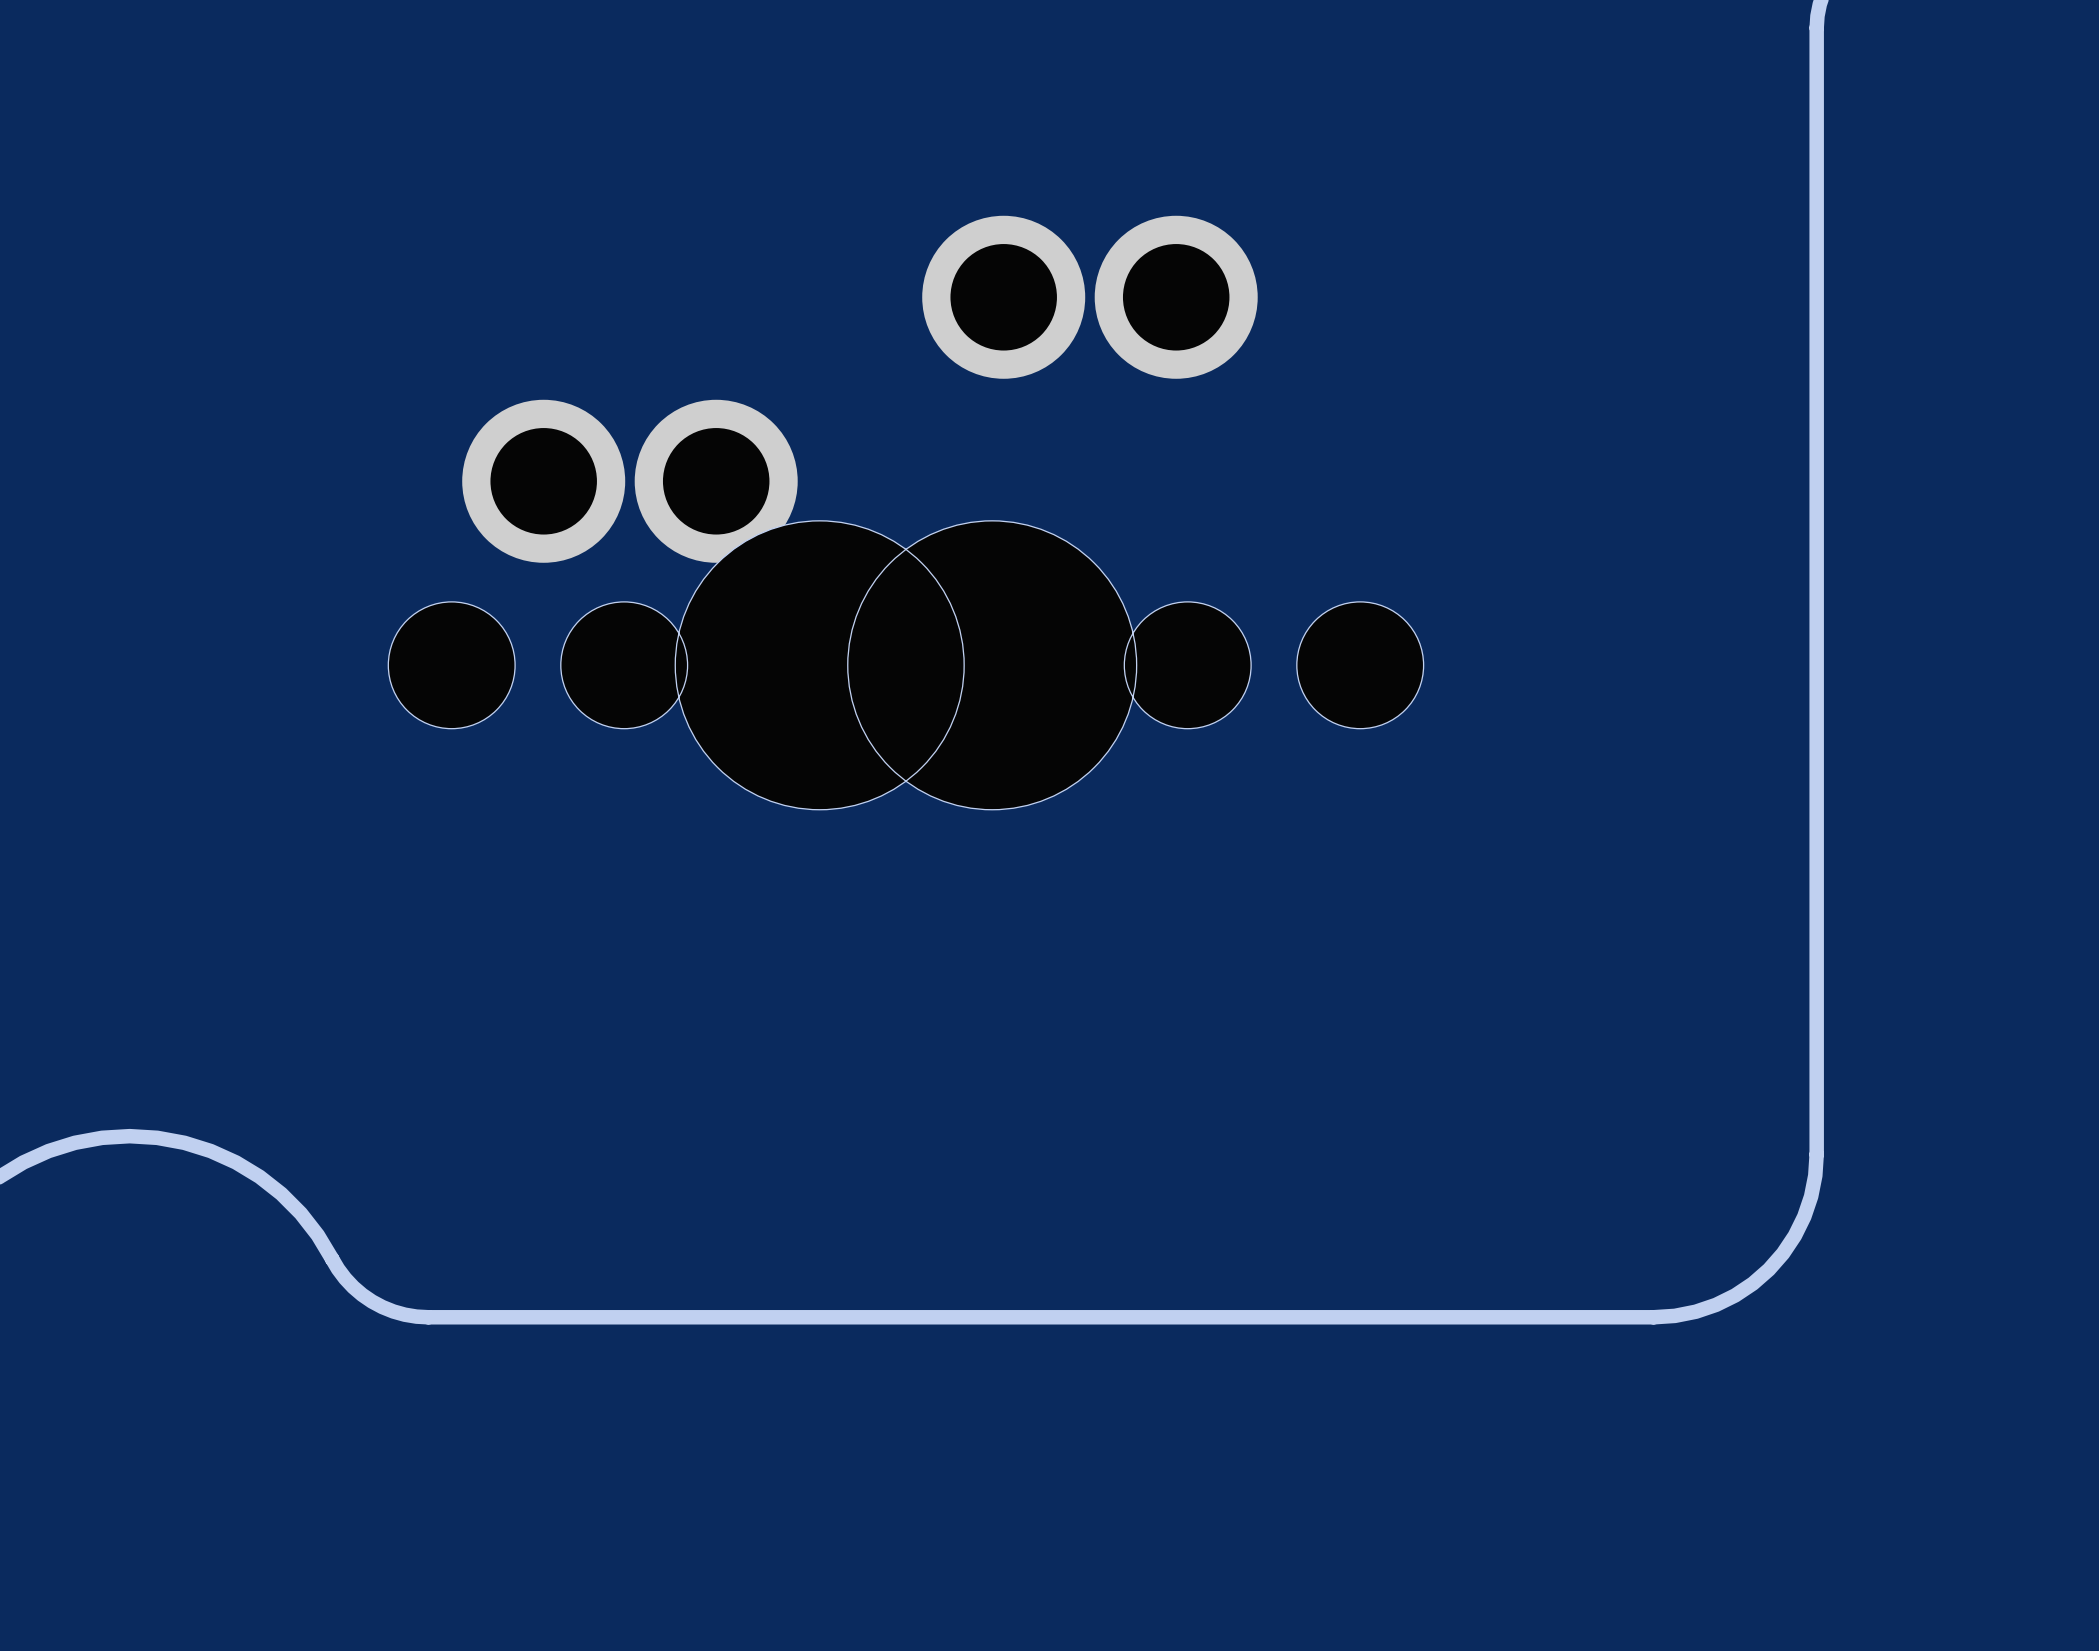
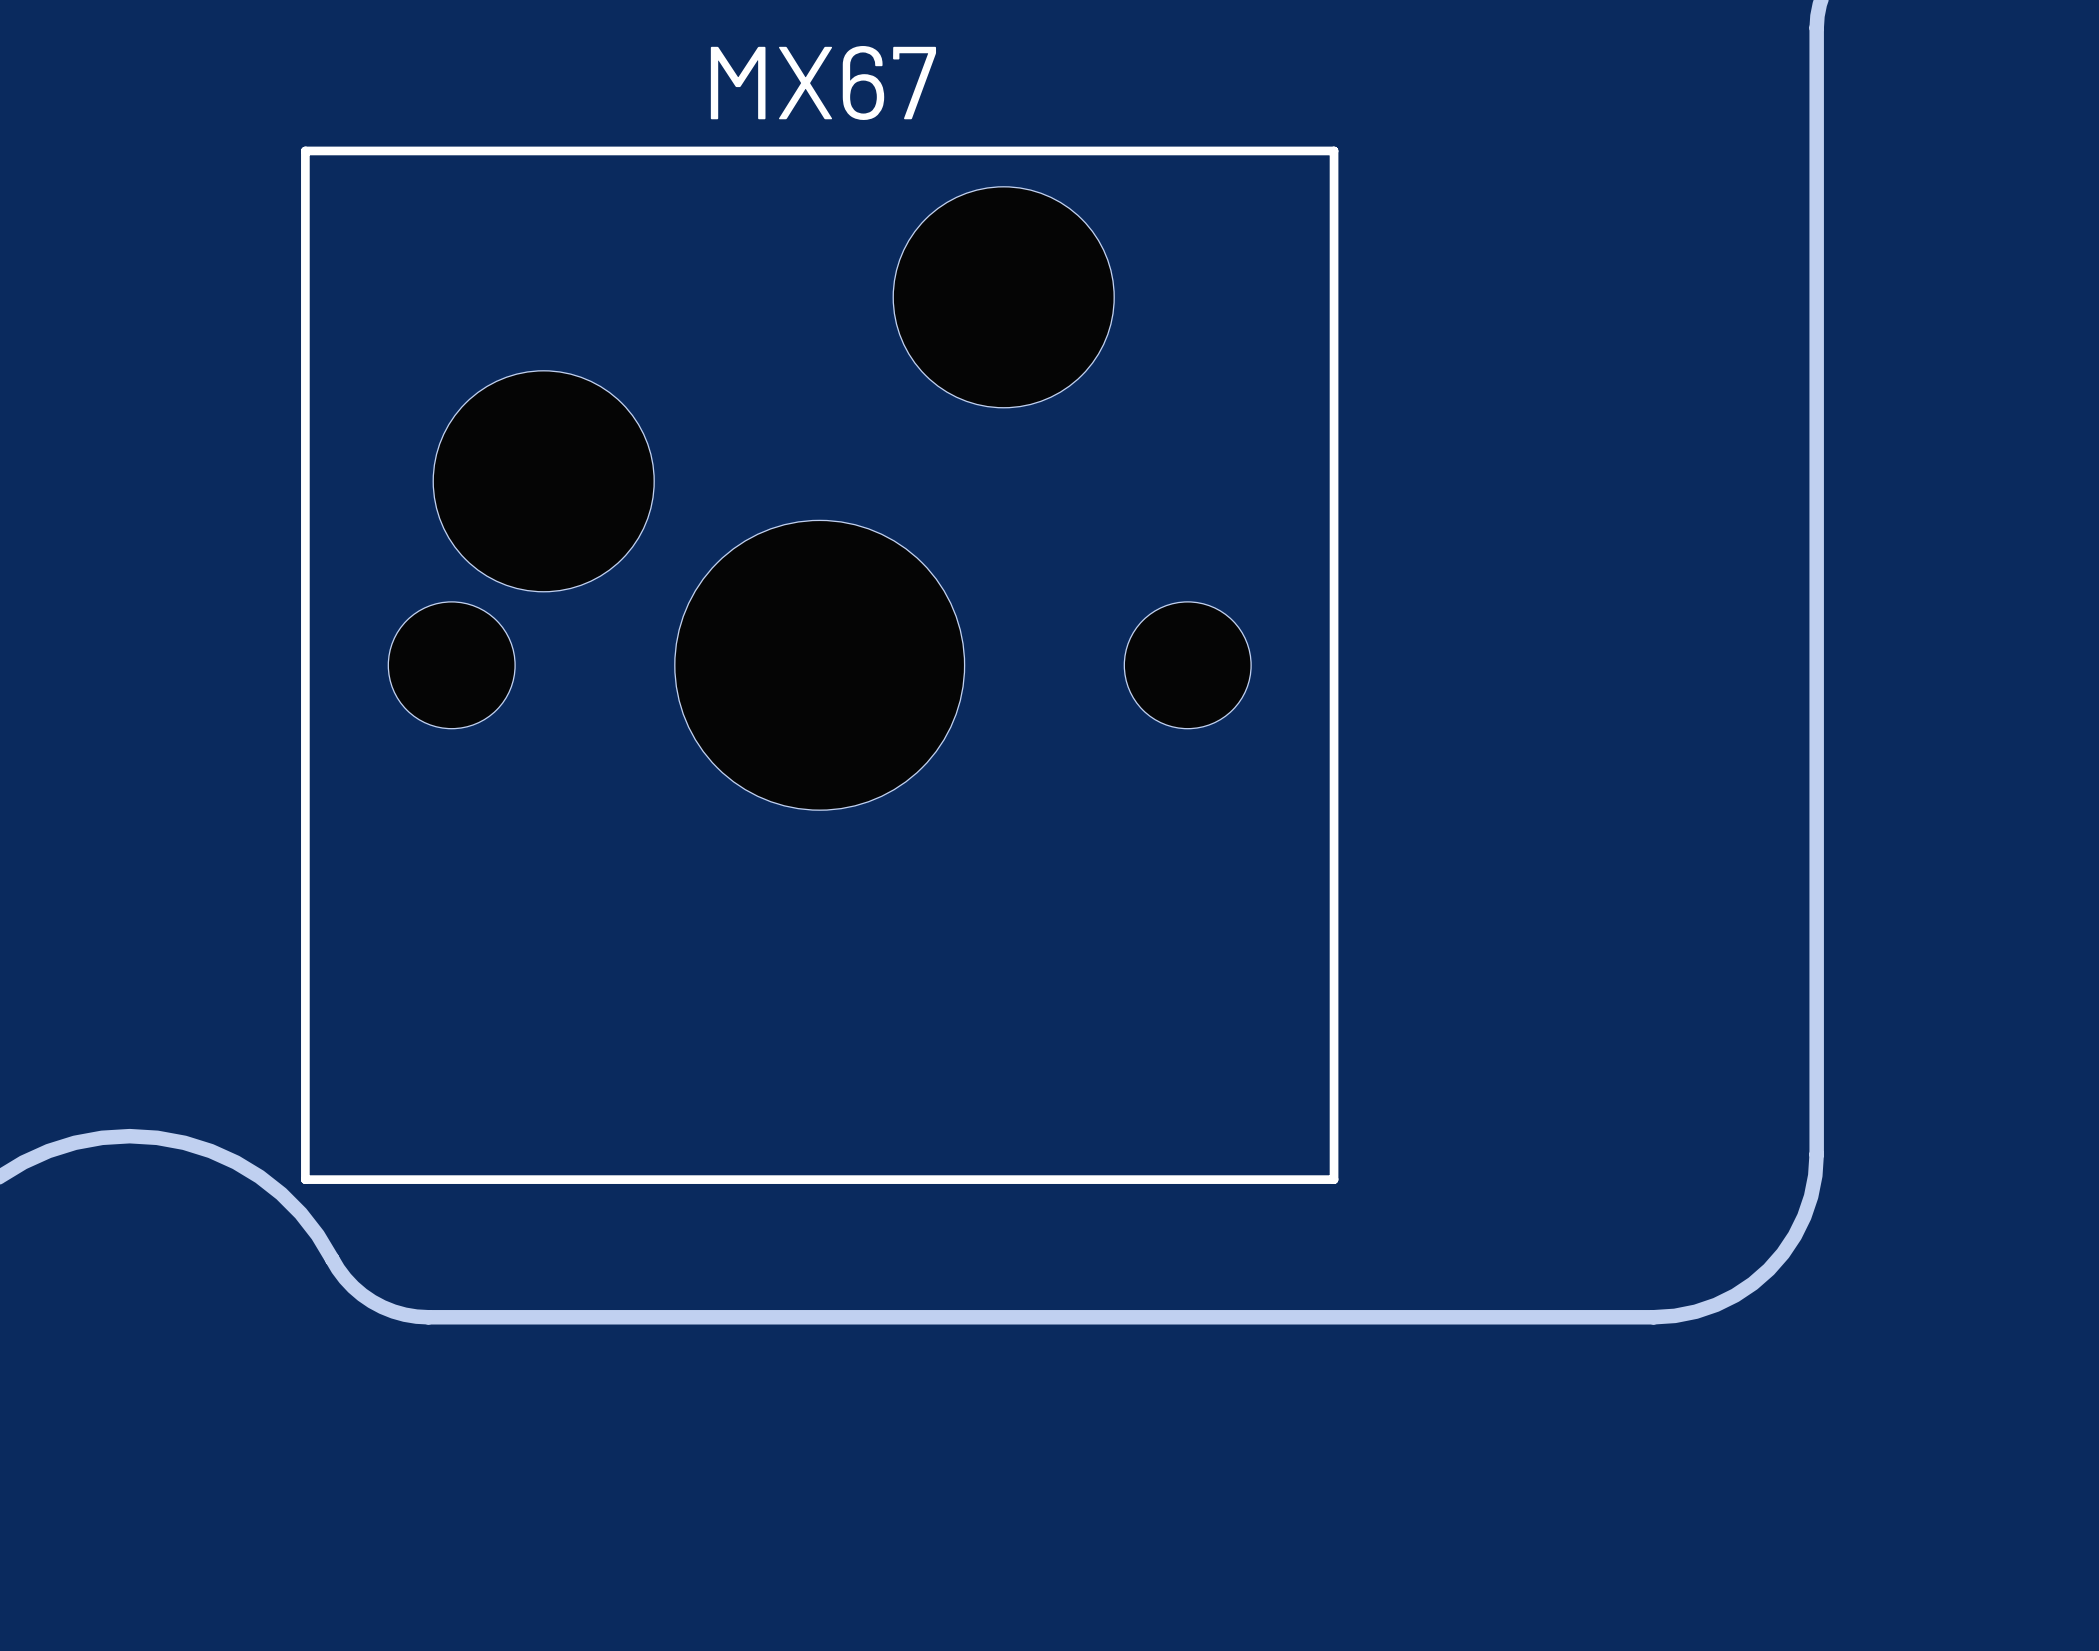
part: (819, 512) -> none
part: (992, 512) -> none
MX67: none -> (819, 665)

